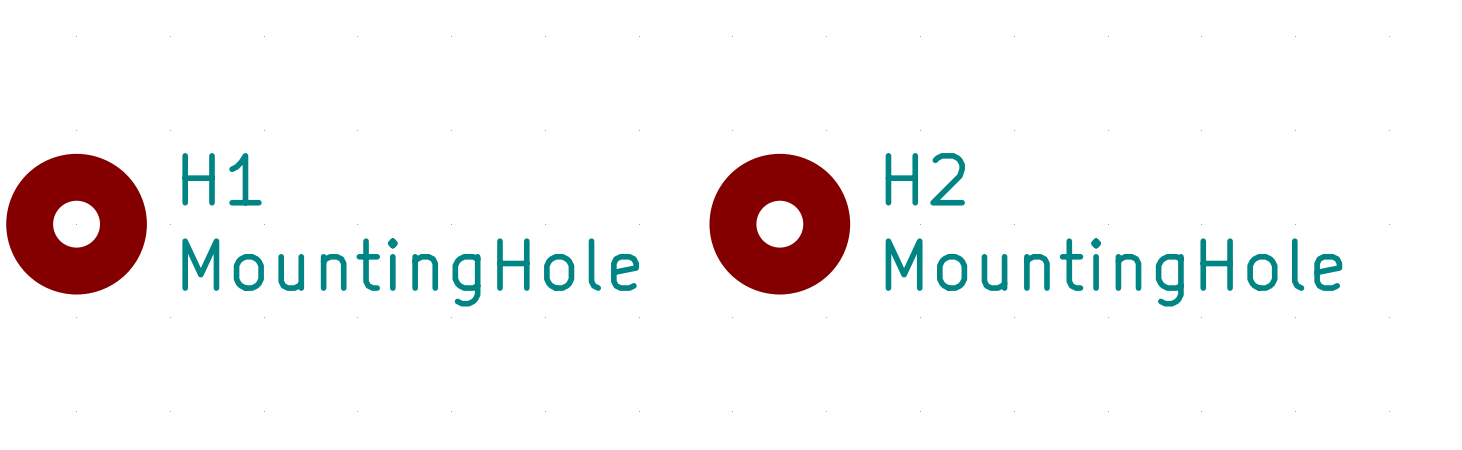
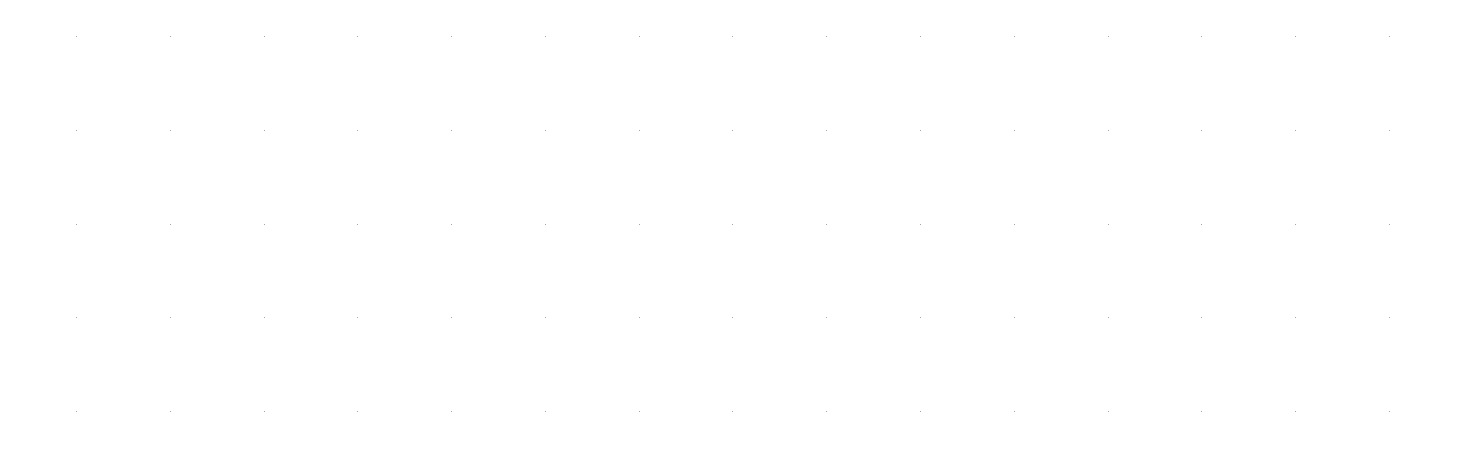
H1: MountingHole (76, 224) -> none
H2: MountingHole (779, 224) -> none

